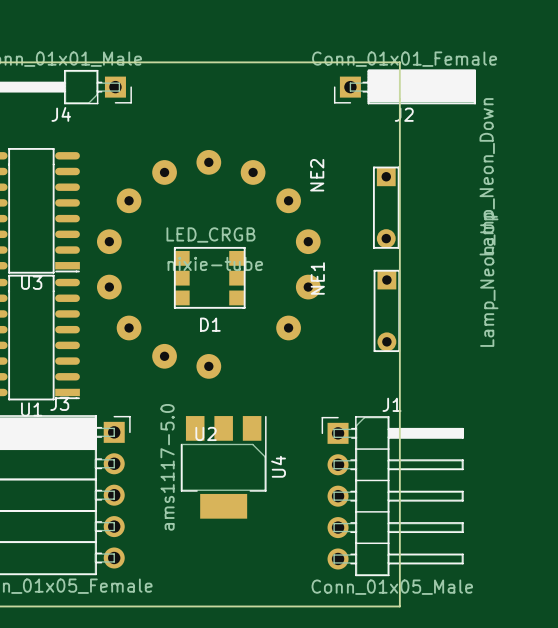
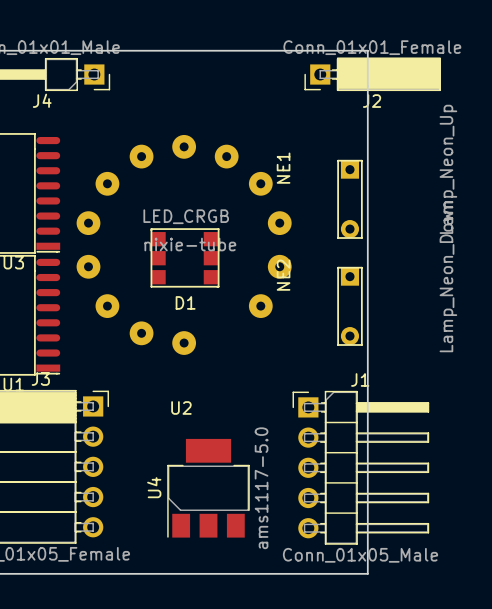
NE2 position: (386, 207) -> (349, 306)
NE1 position: (386, 310) -> (349, 199)
U4 rotation: 0° (223, 467) -> 180° (208, 488)

